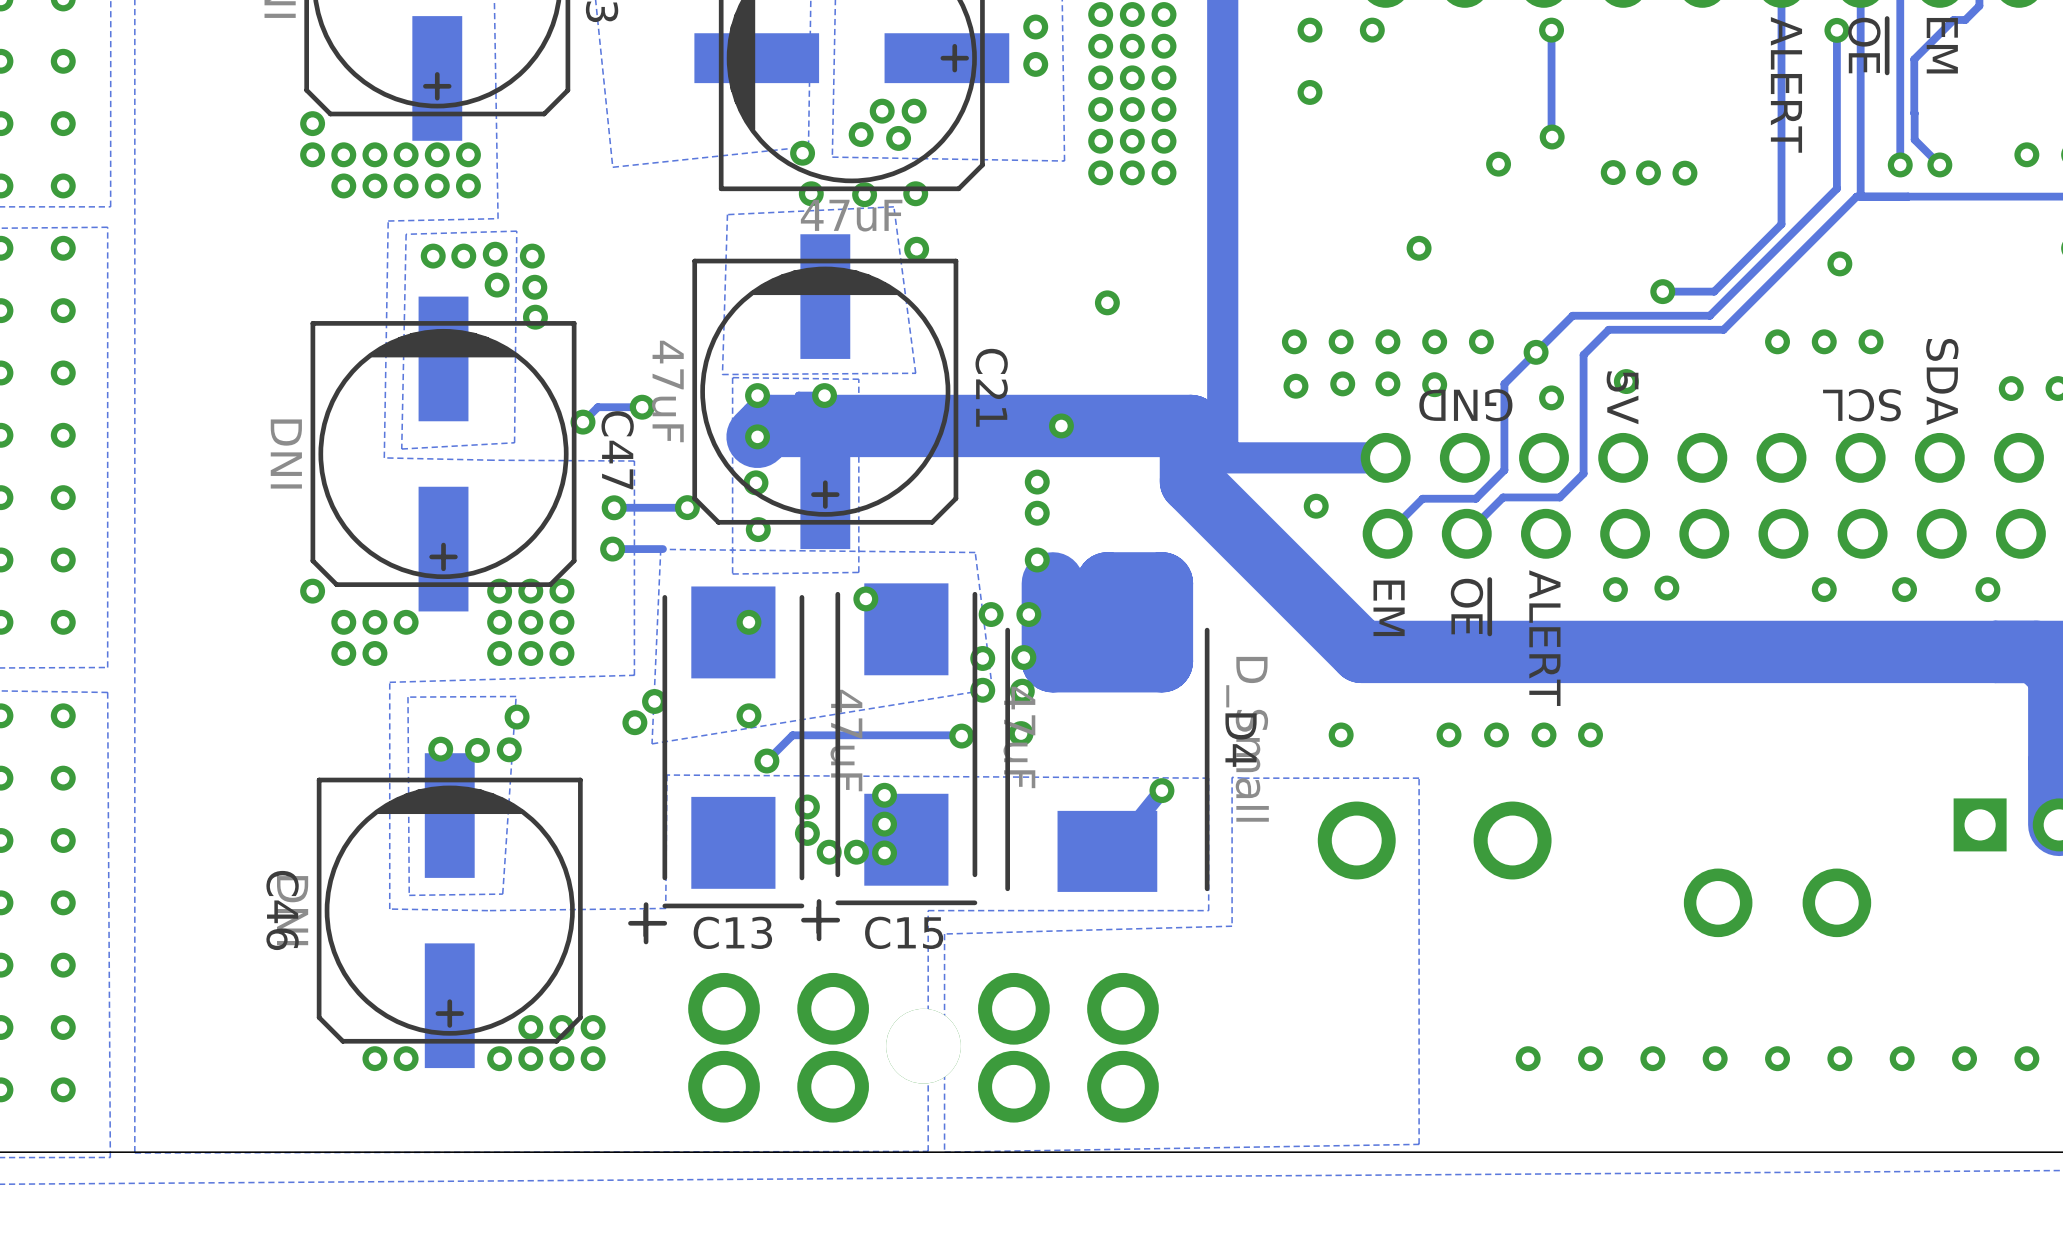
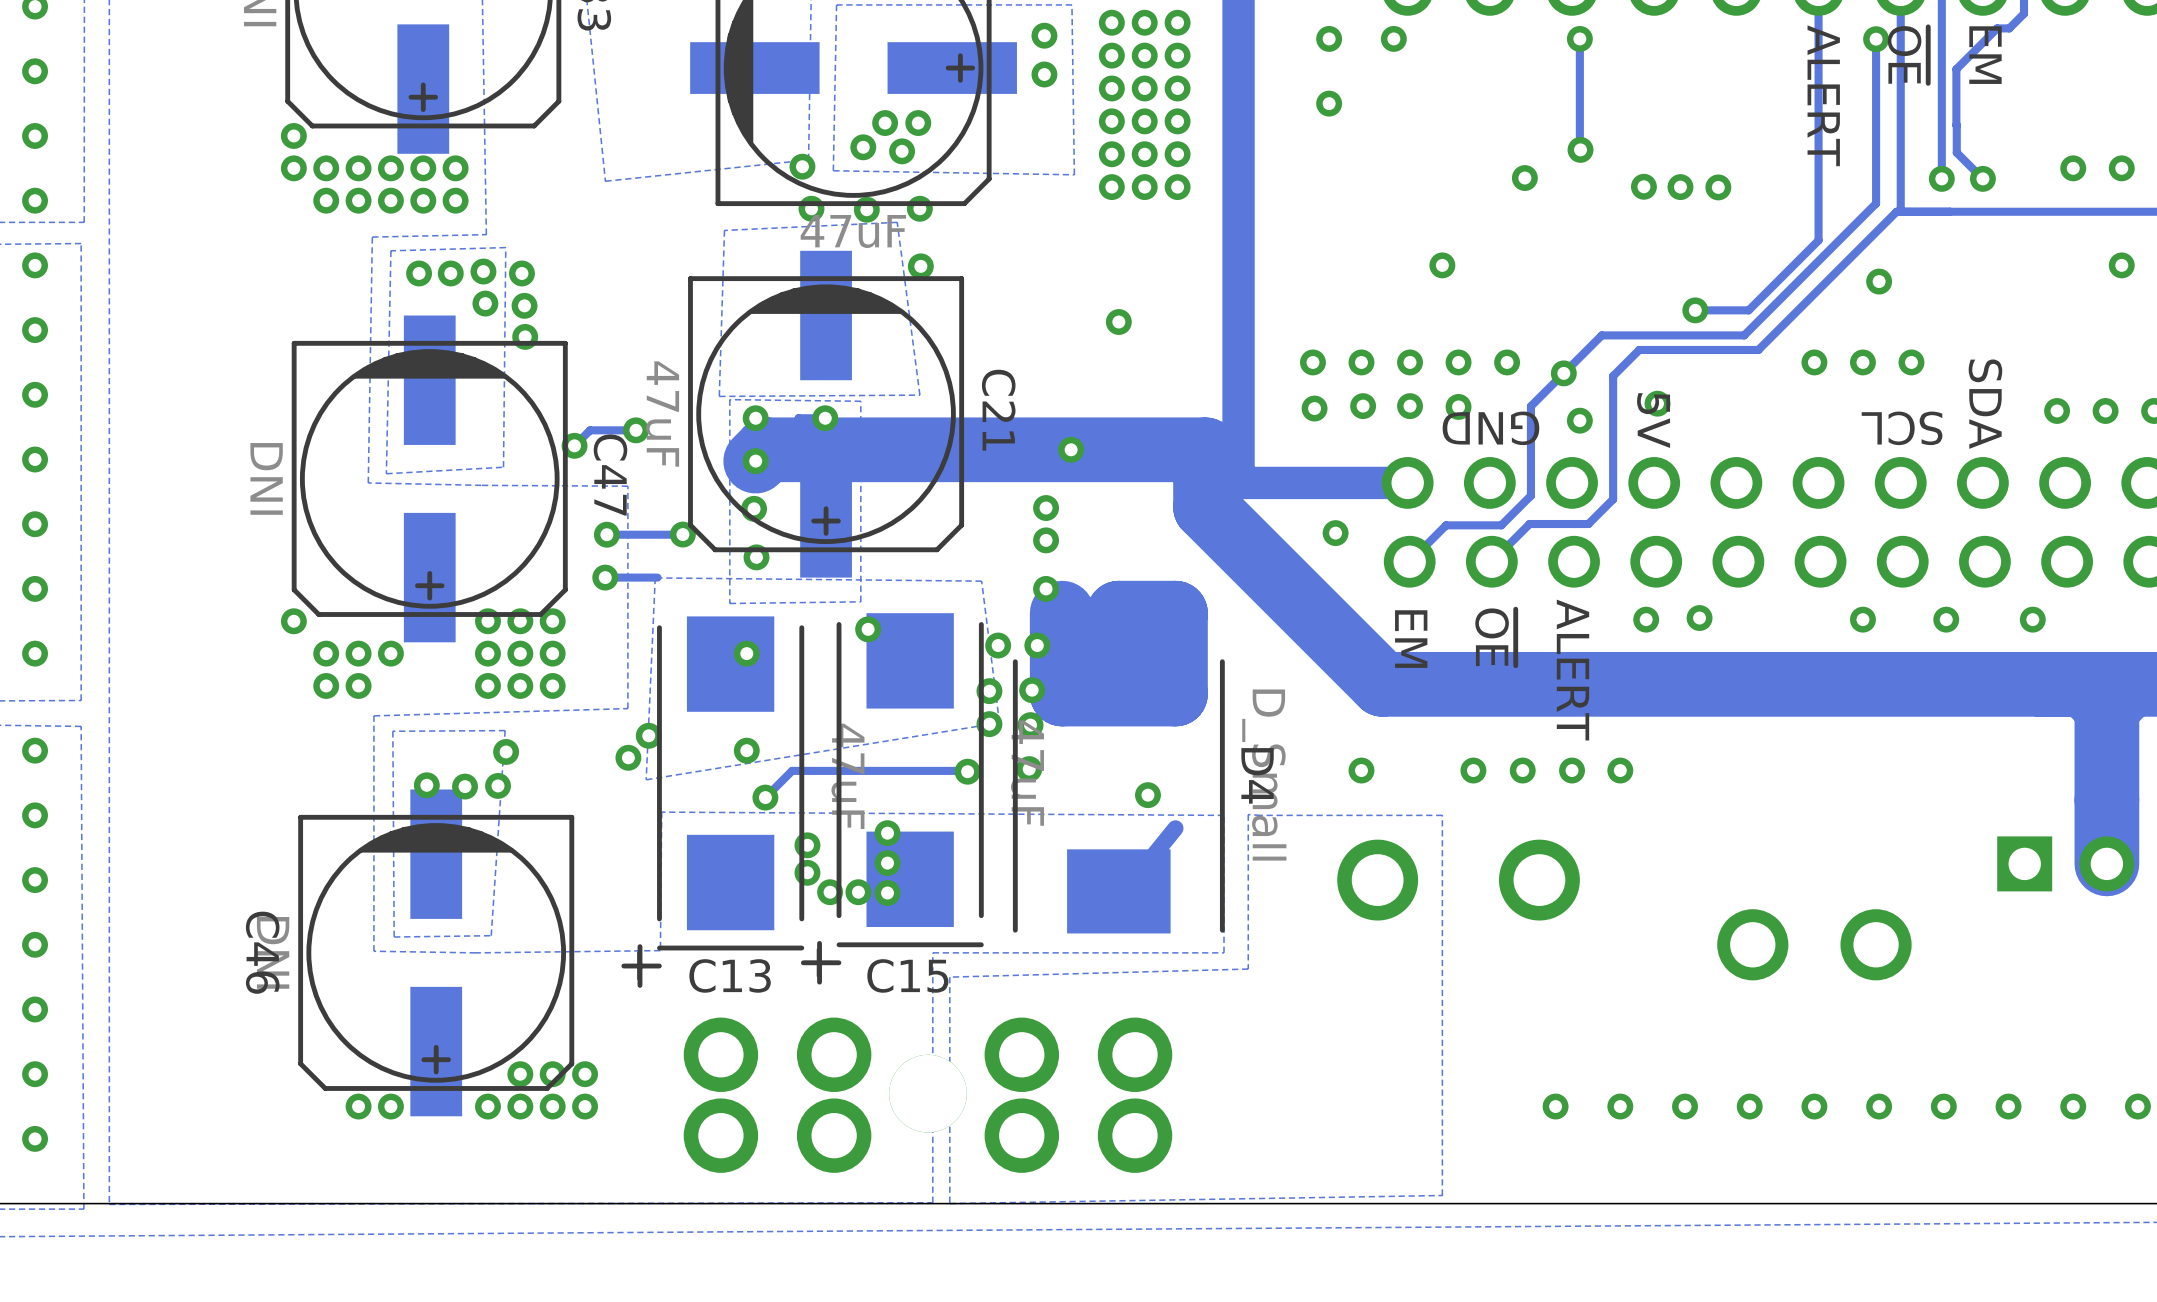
via position: (1161, 790) -> (1147, 795)

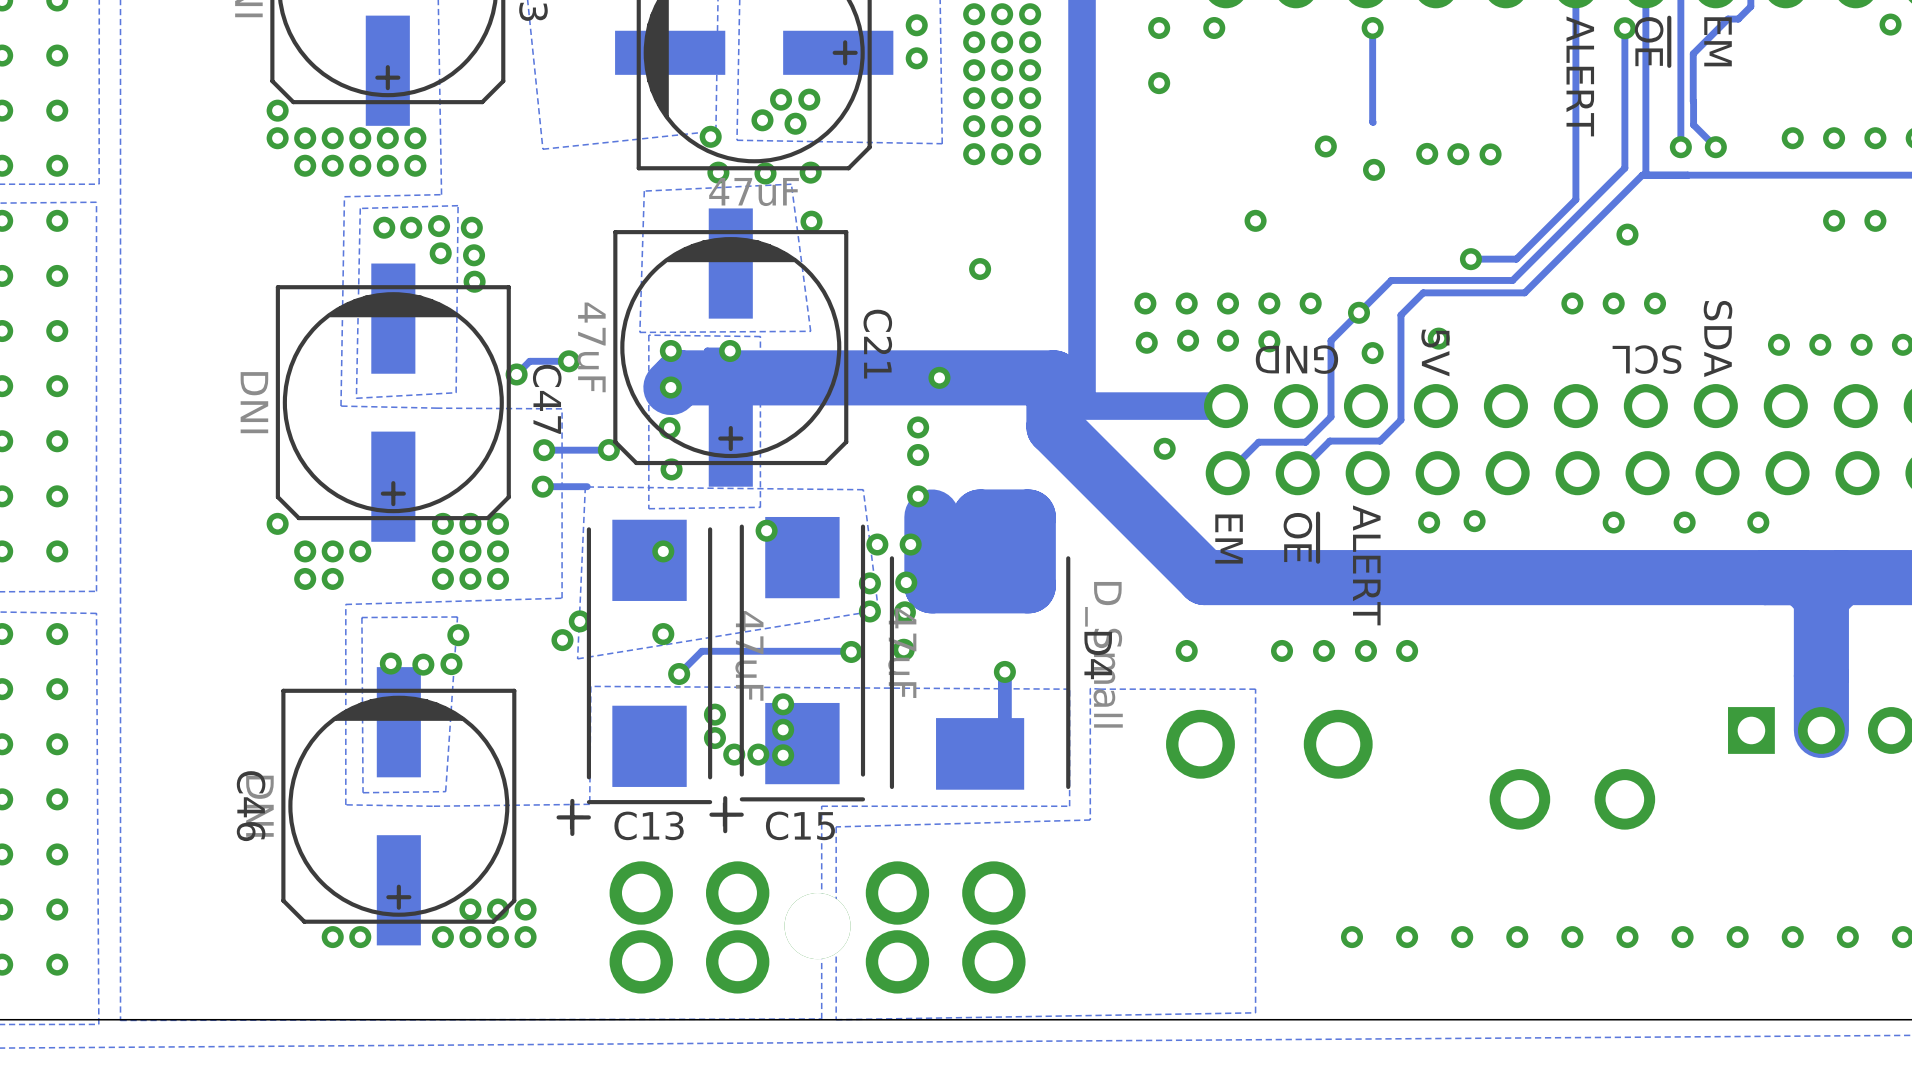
via position: (1580, 149) -> (1374, 169)
track: (1175, 828) (1147, 862) -> (1004, 671) (1004, 729)

